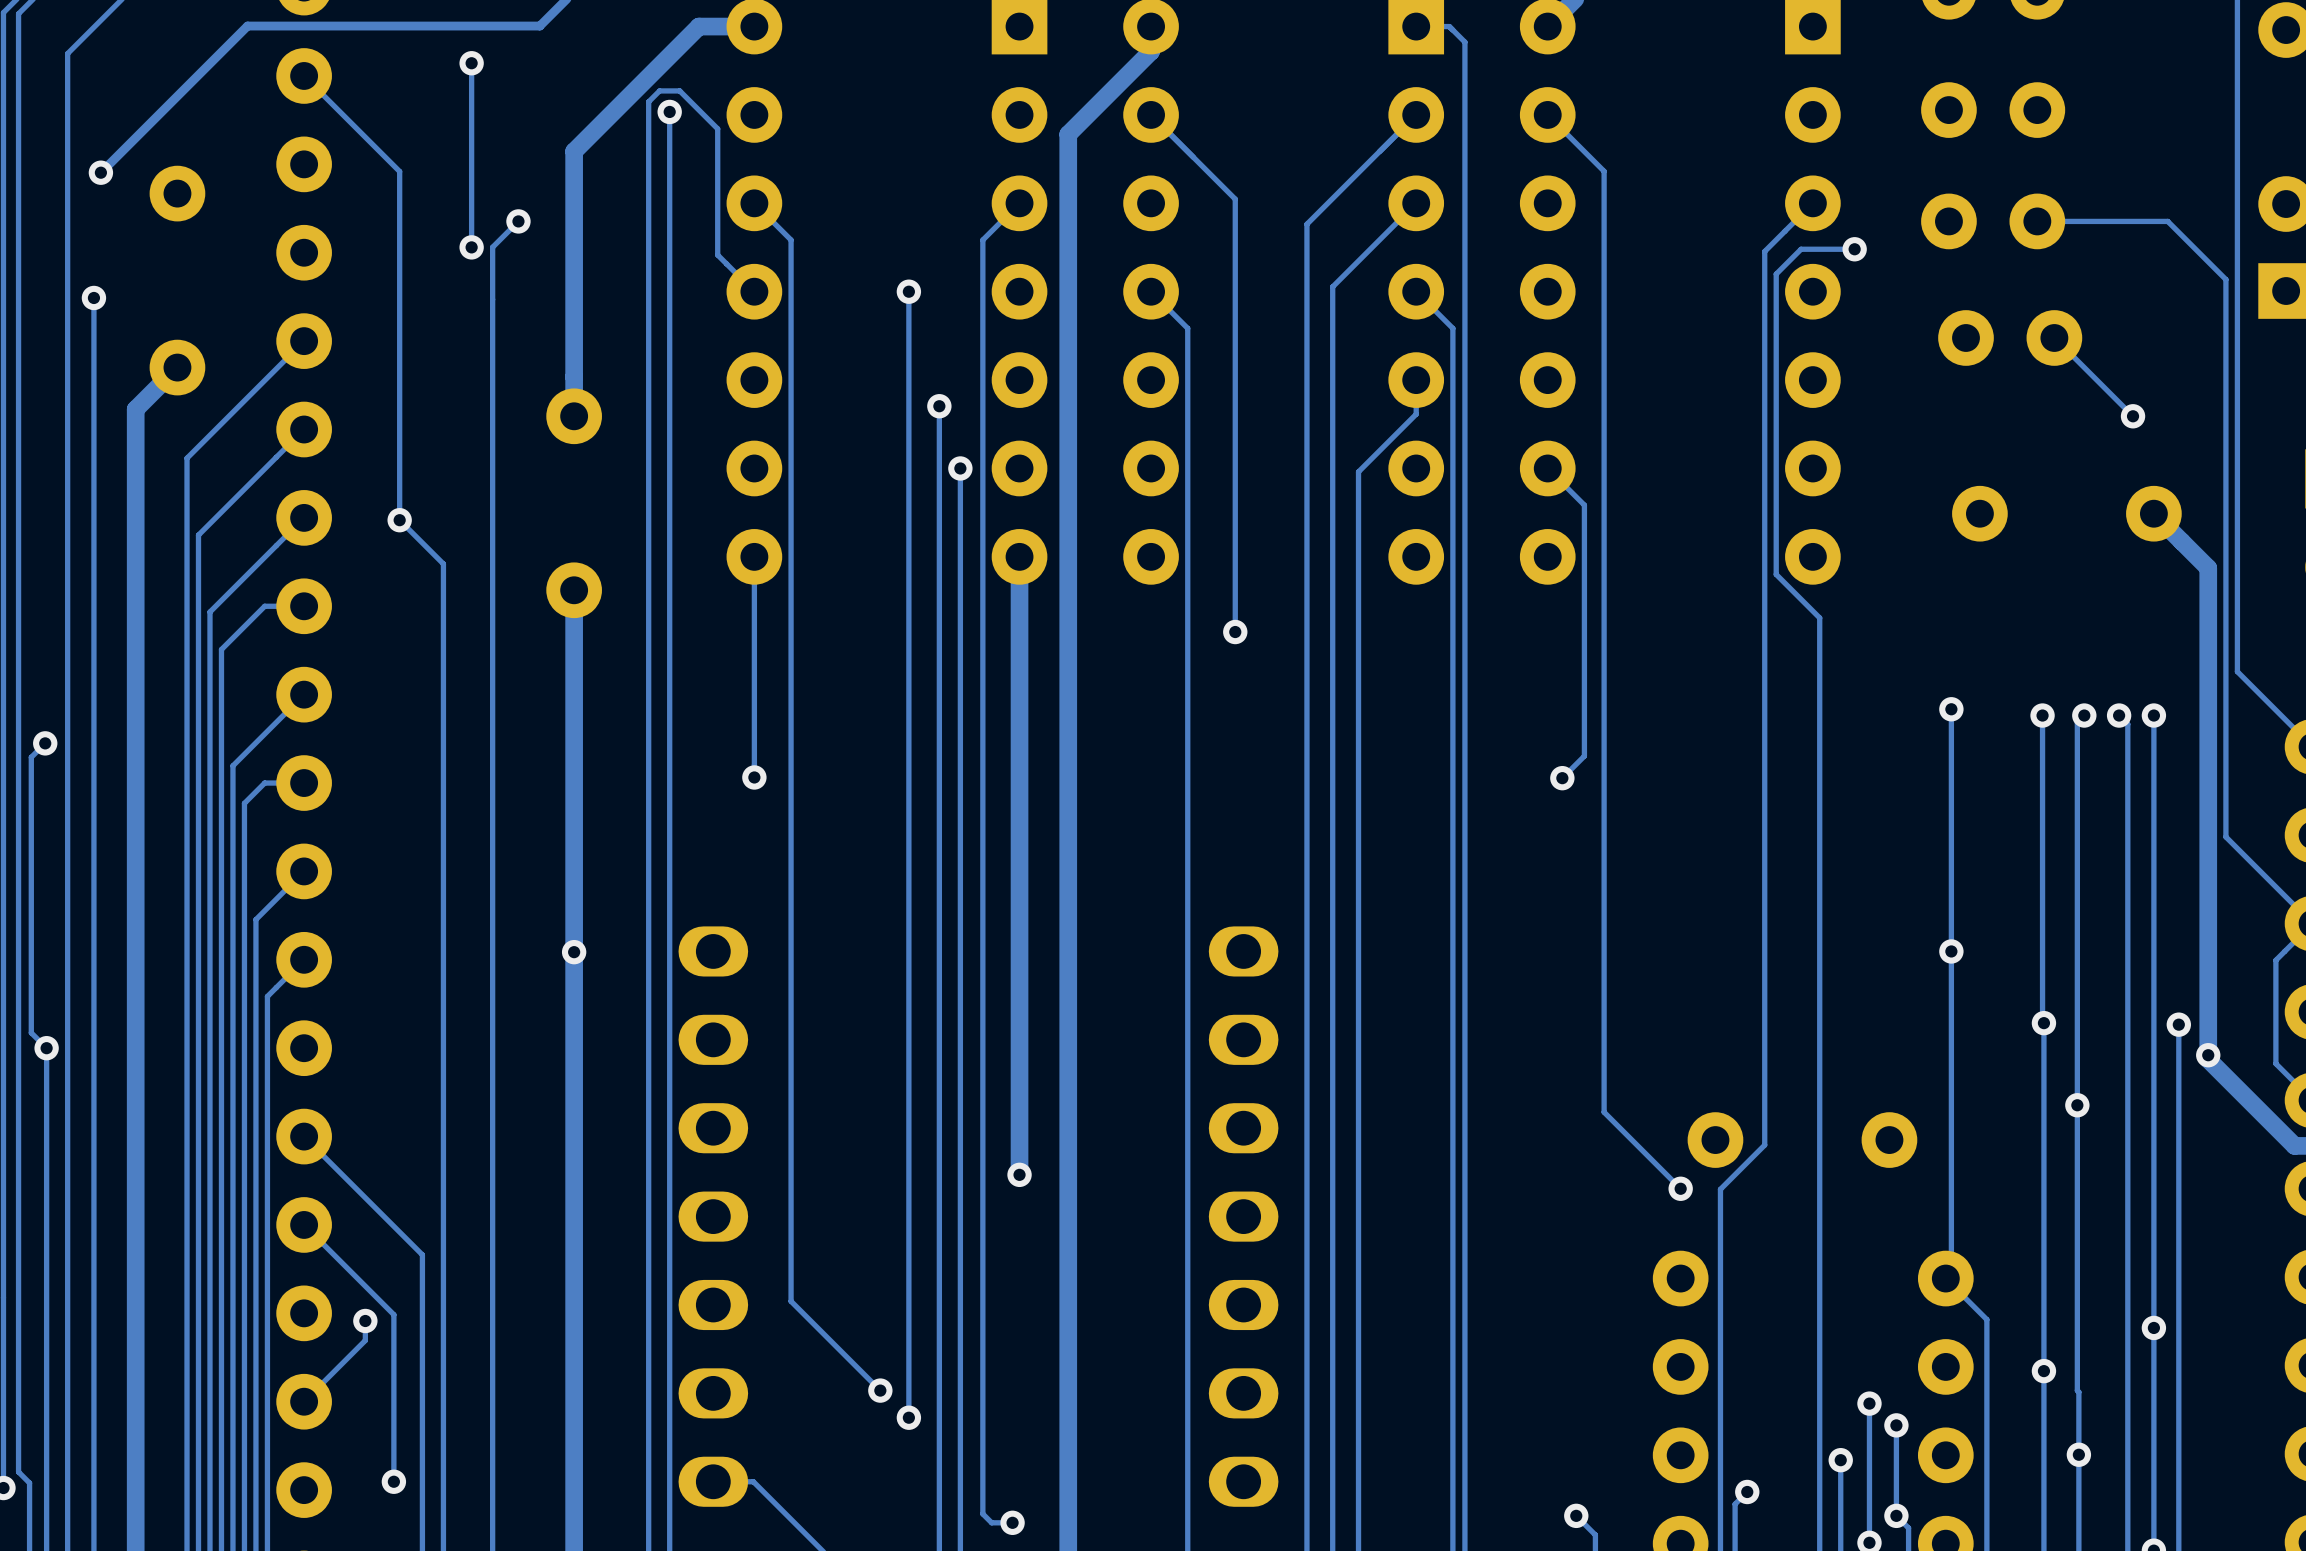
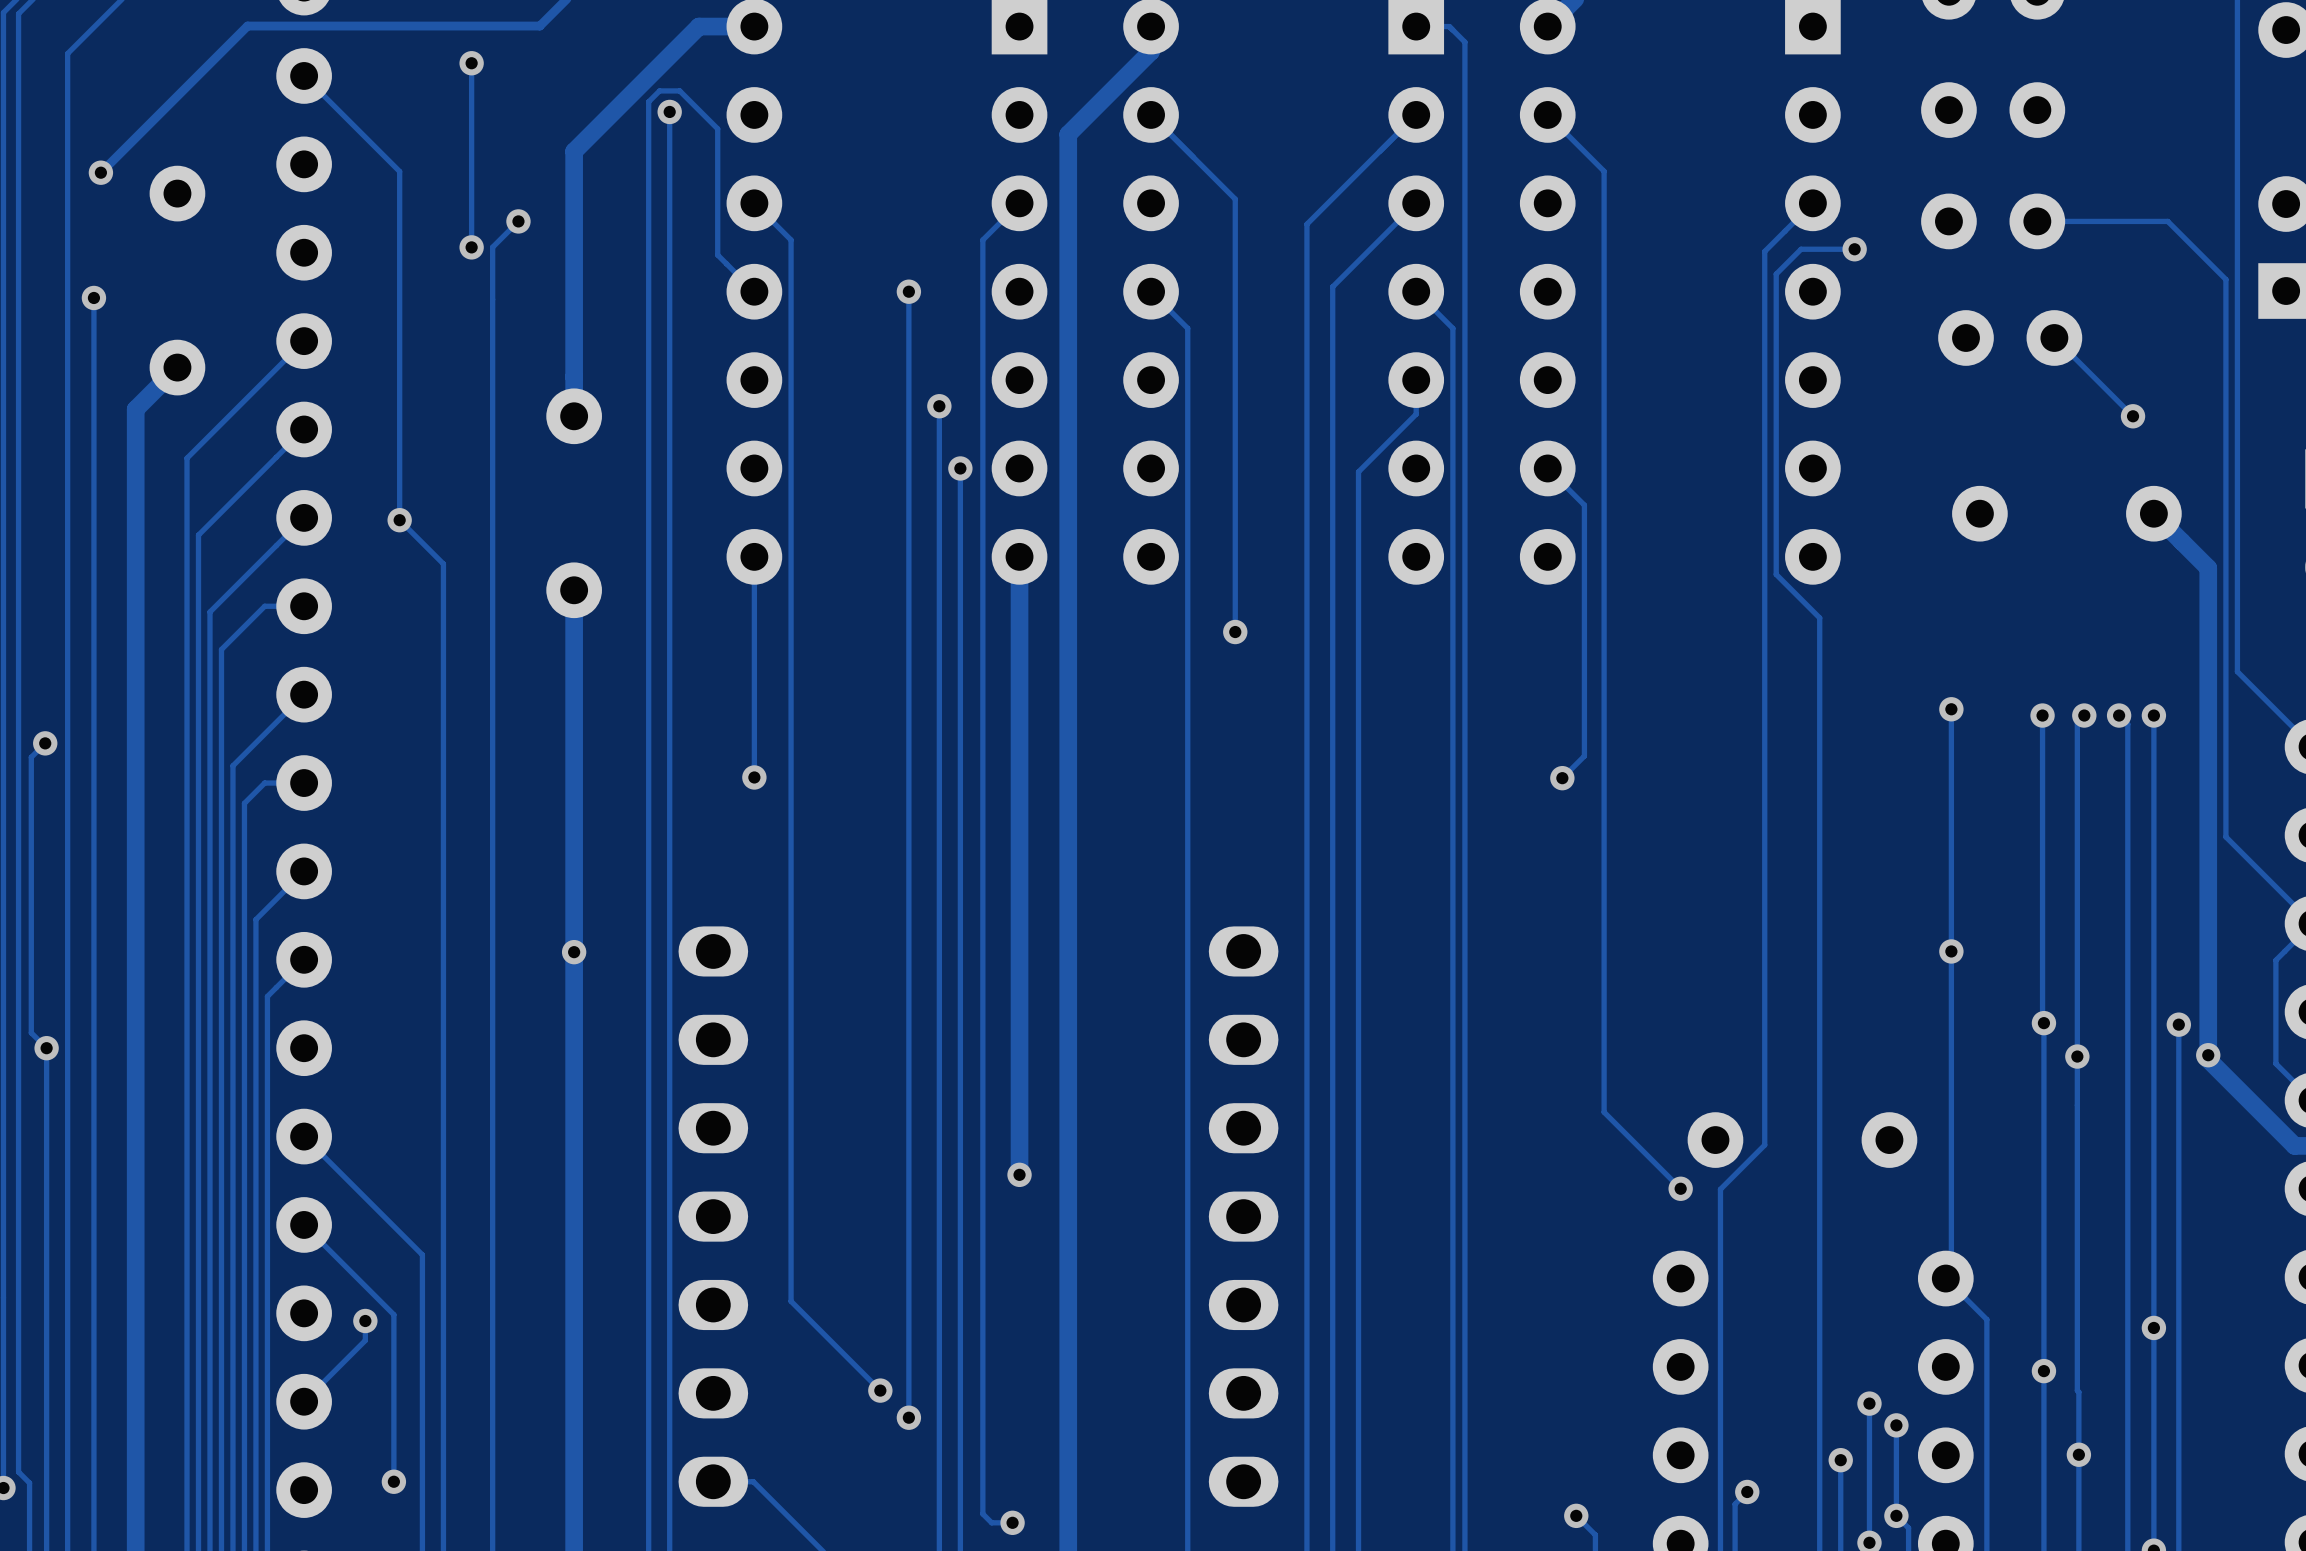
via position: (2077, 1105) -> (2077, 1056)

